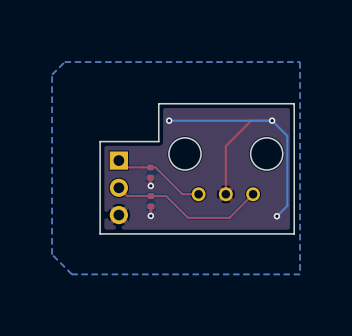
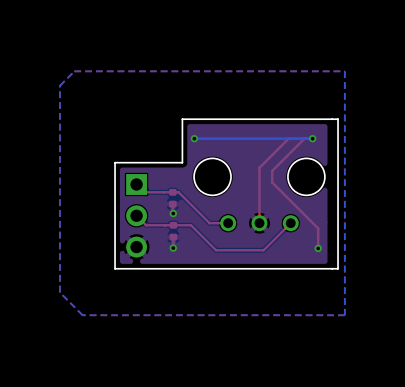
top track: none -> (304, 138) (272, 170) (272, 182) (318, 228) (318, 248)
bottom track: (272, 120) (287, 135) (287, 205) (276, 216) -> none

